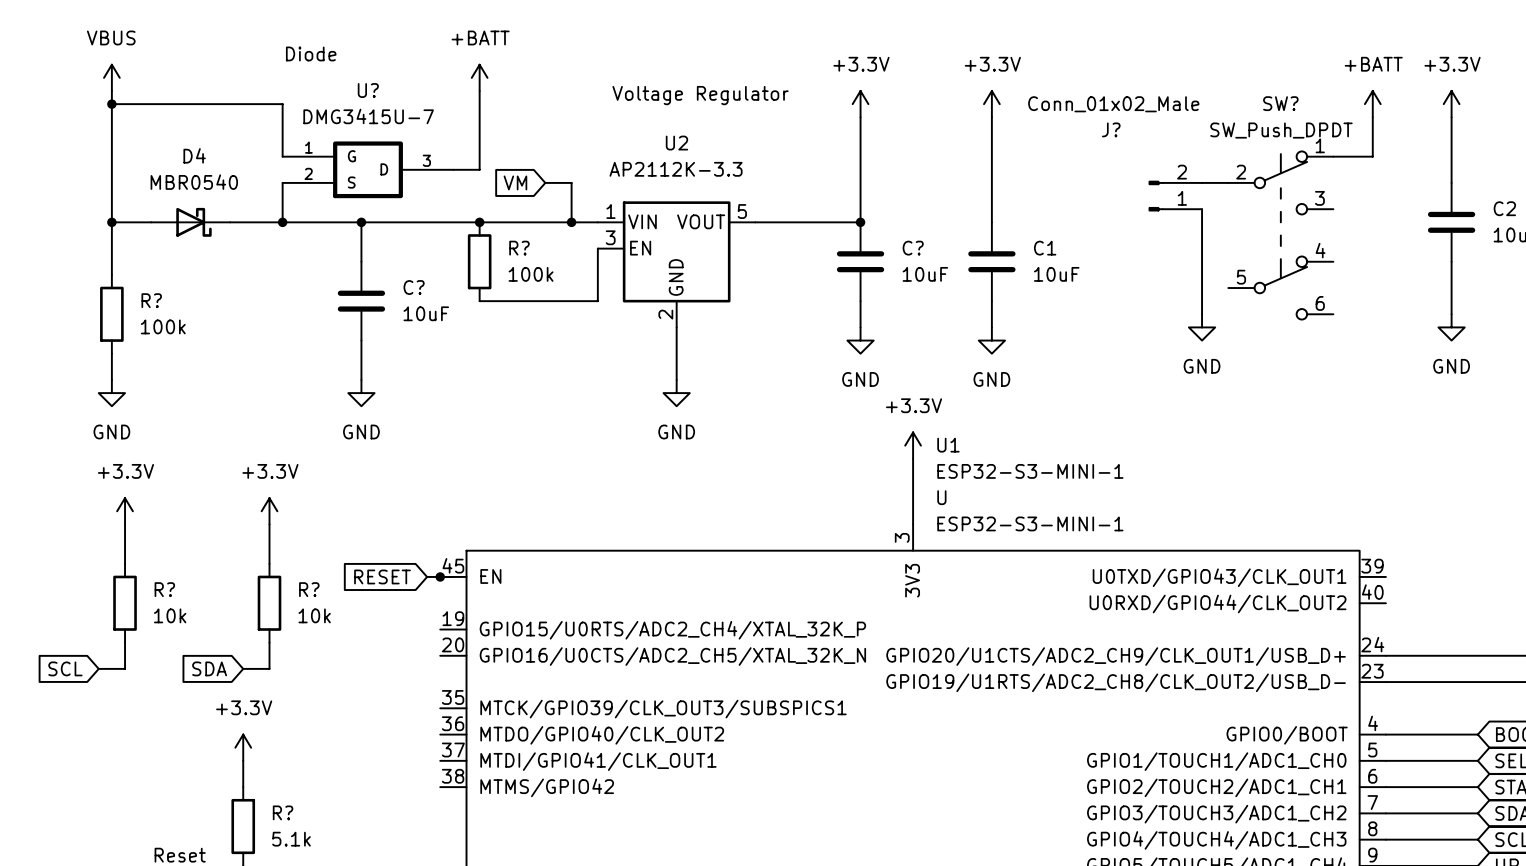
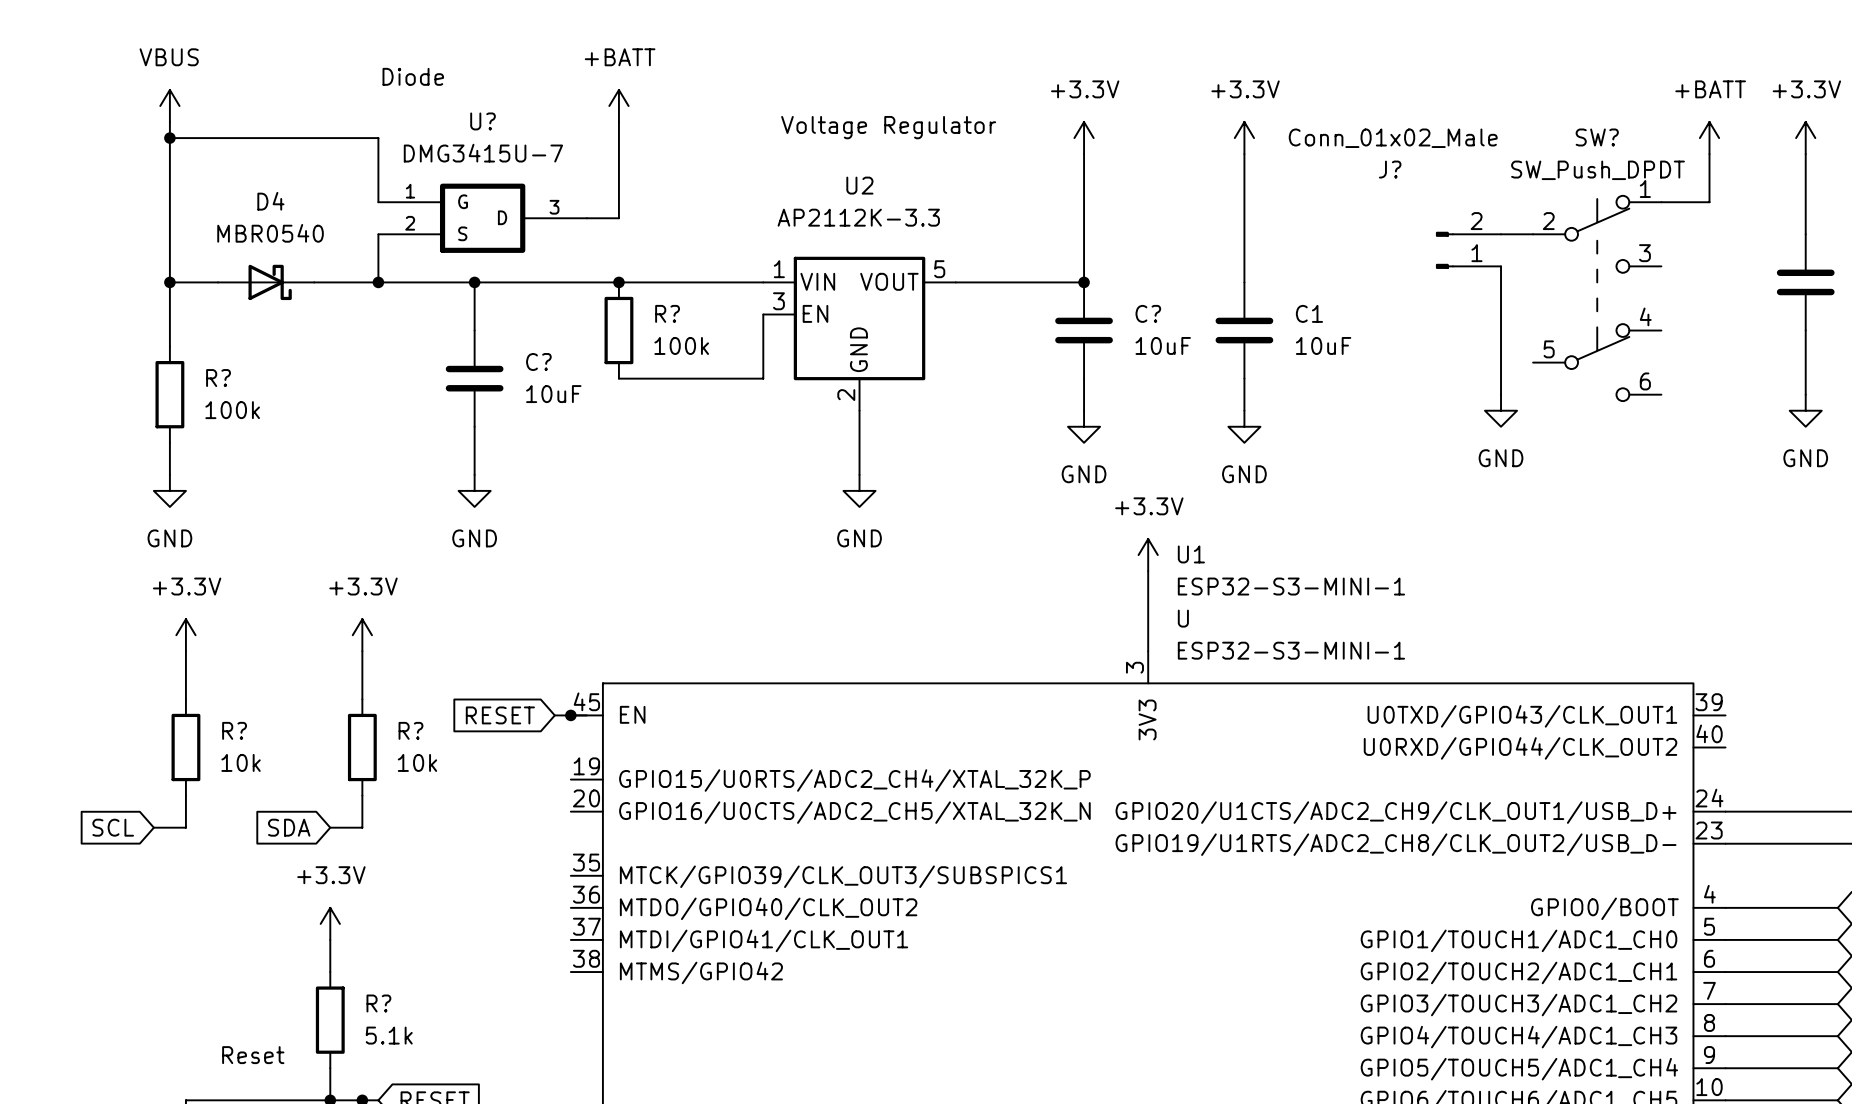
global label: VM (515, 182) -> none
wire: (545, 182) (571, 182) (571, 222) -> none
junction: (571, 222) -> none

